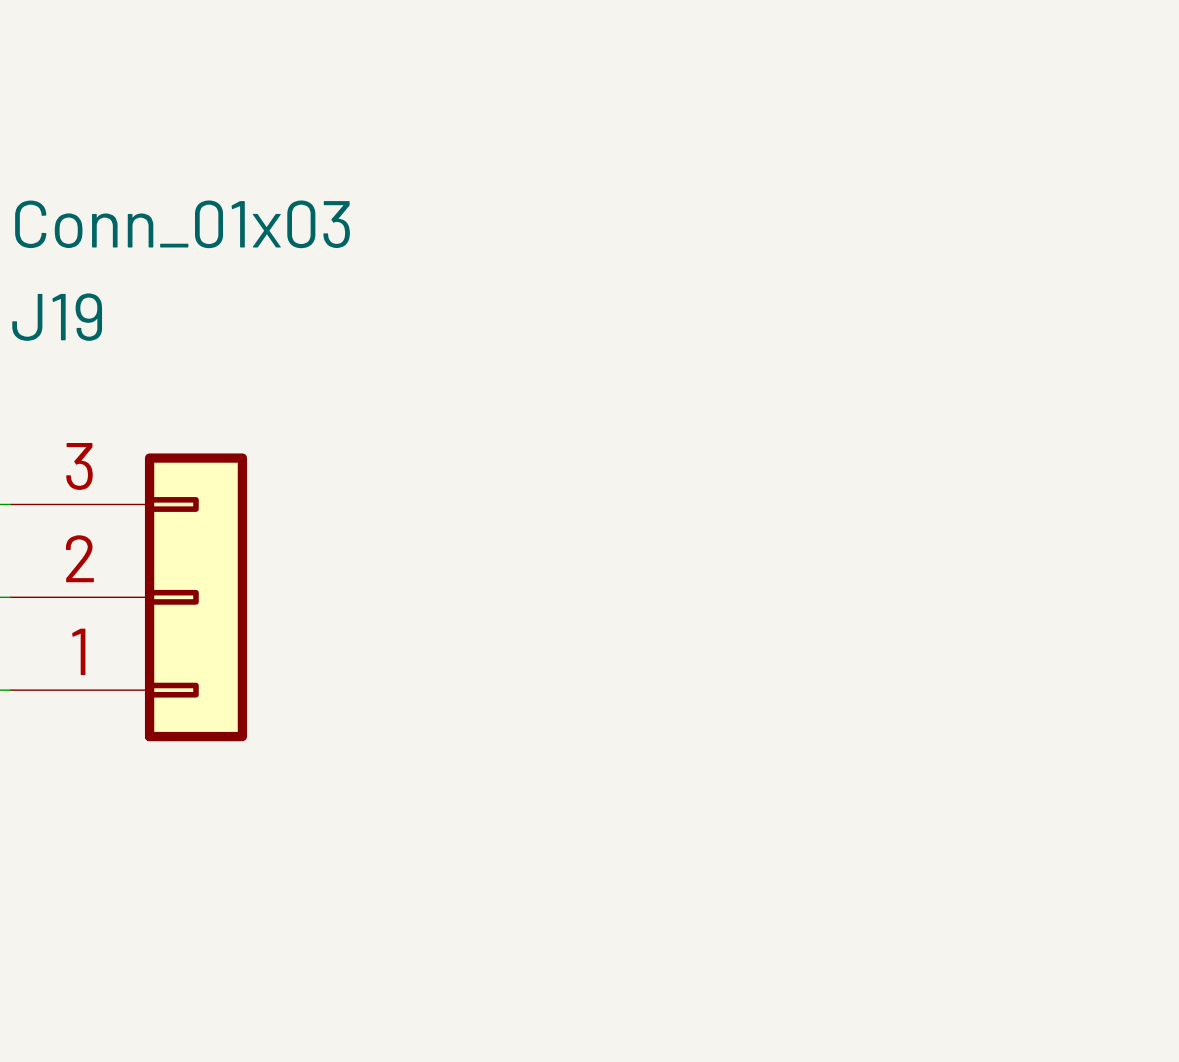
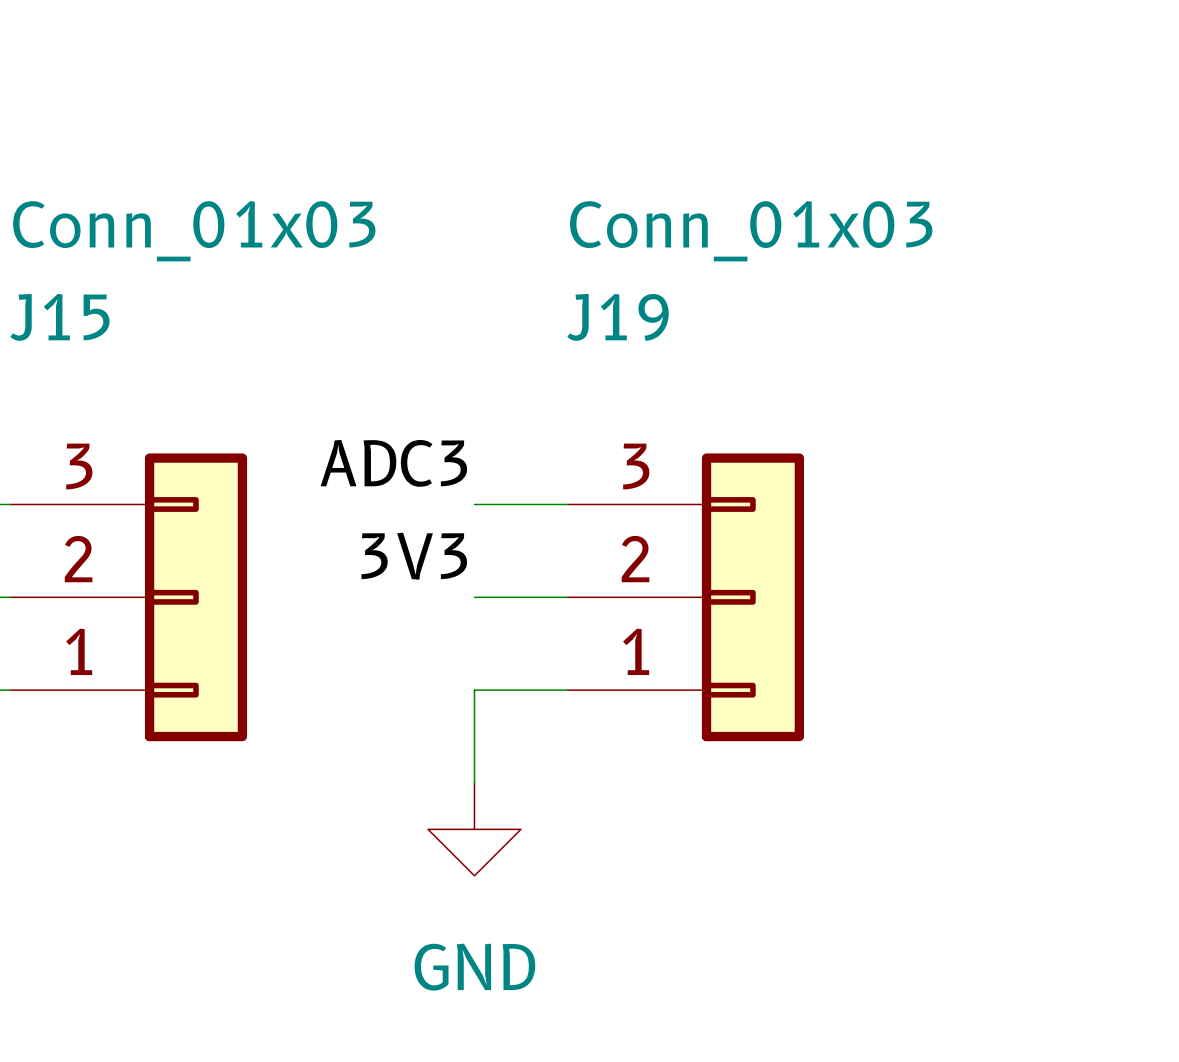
J19 name: J19 (57, 317) -> J15 (59, 317)
label: none -> ADC3 (393, 463)
wire: none -> (474, 504) (567, 504)
label: none -> 3V3 (414, 556)
wire: none -> (474, 597) (567, 597)
J19: none -> Conn_01x03 (685, 597)
wire: none -> (567, 690) (474, 690) (474, 782)
power symbol: none -> GND (474, 829)

